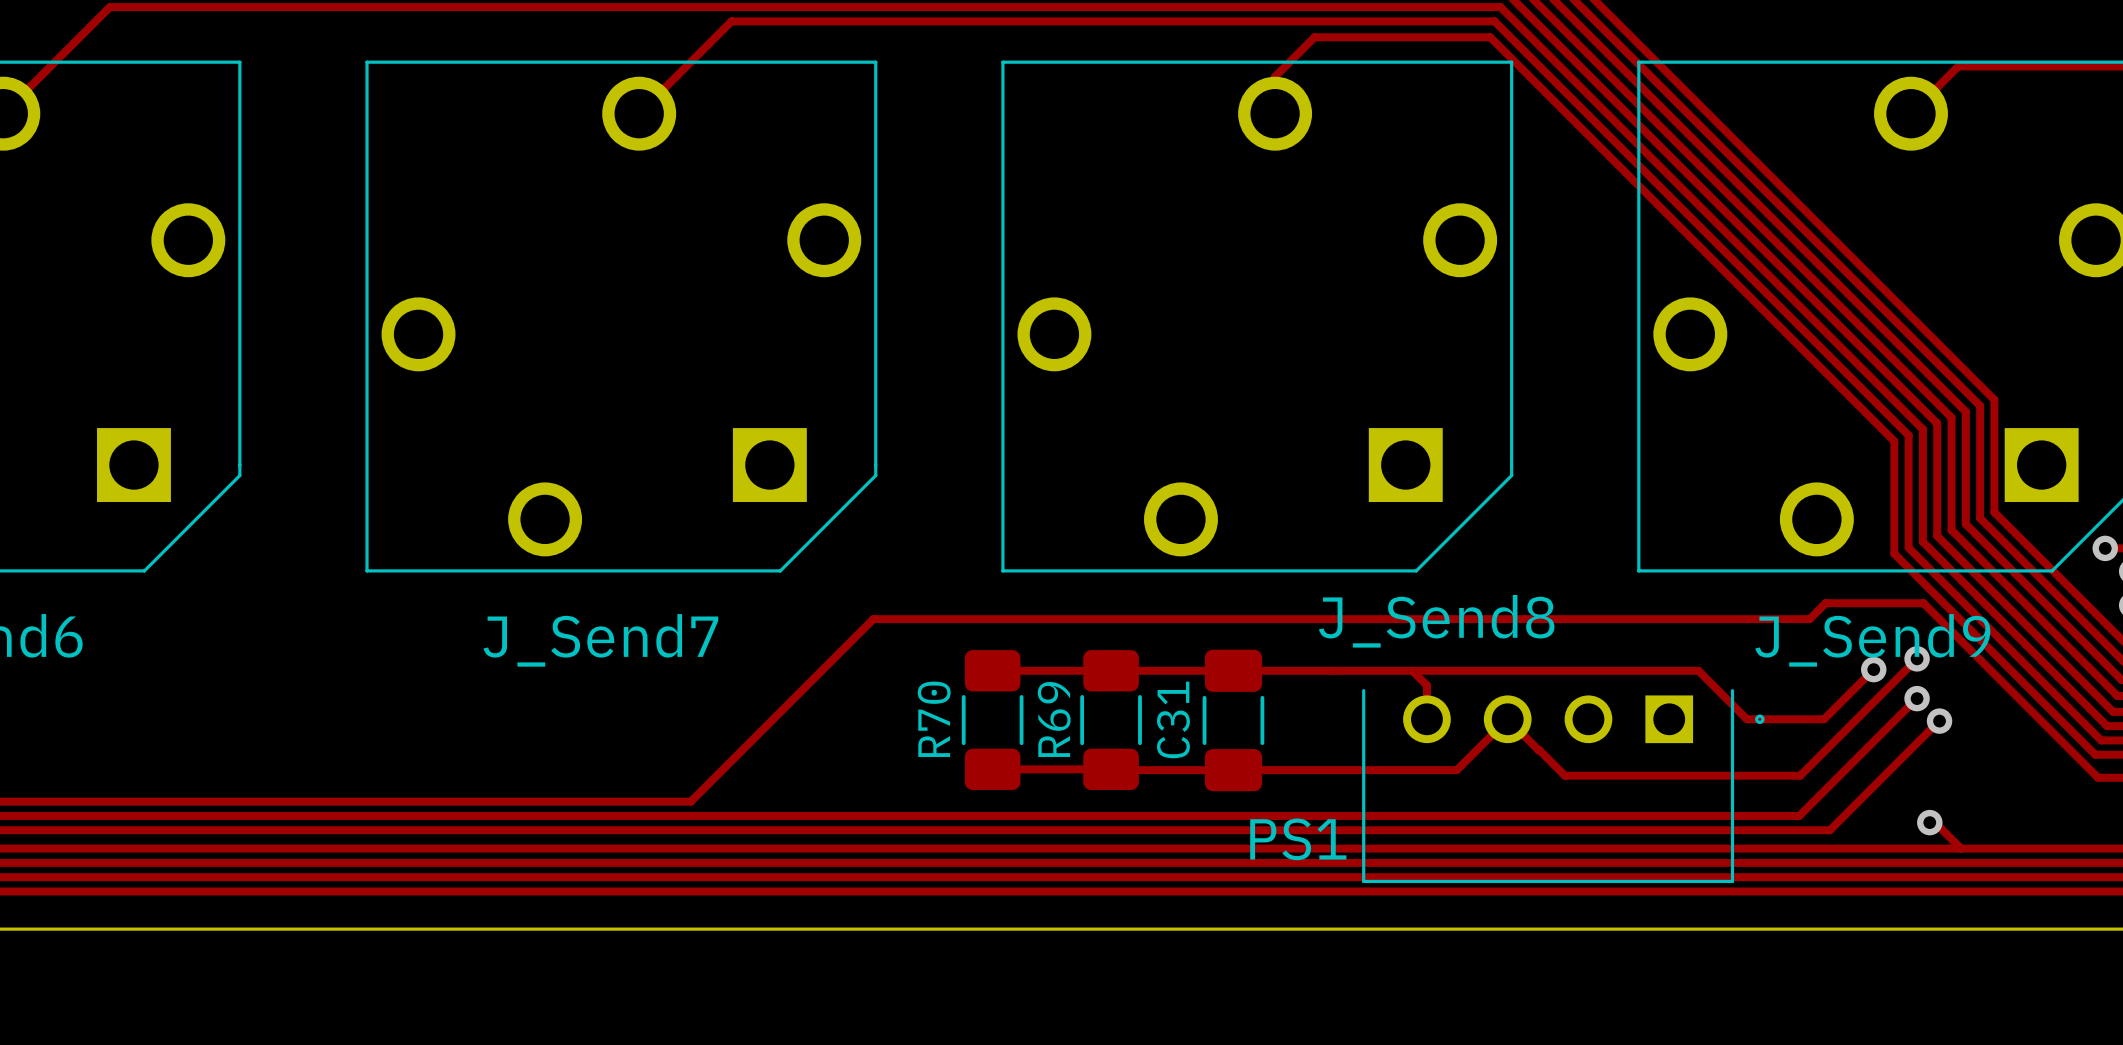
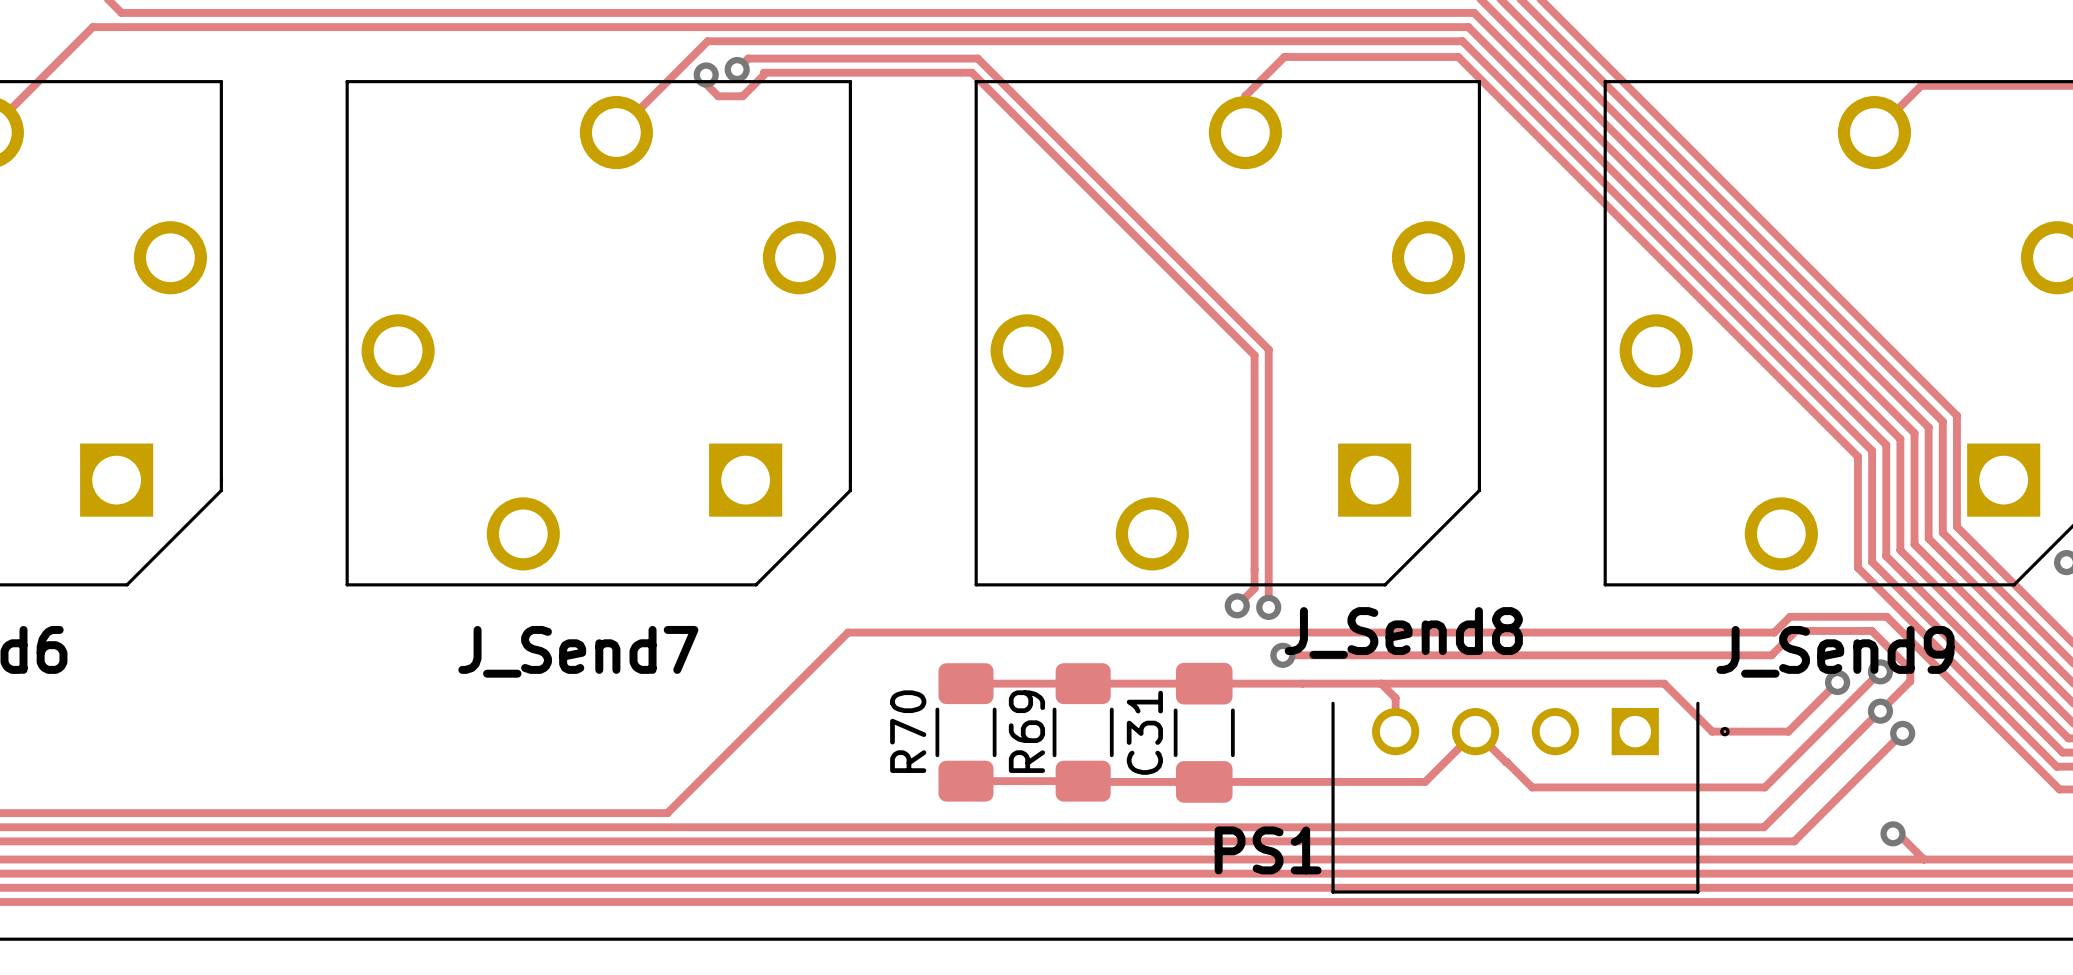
track: none -> (737, 69) (748, 58) (977, 58) (1268, 349) (1268, 607)
via: none -> (737, 69)
track: none -> (706, 74) (706, 84) (718, 96) (742, 96) (763, 75) (763, 72) (971, 72) (1254, 355) (1254, 588) (1237, 605)
via: none -> (706, 74)
via: none -> (1237, 605)
via: none -> (1268, 607)
track: none -> (1282, 655) (1771, 655) (1795, 630) (1871, 630) (1910, 669) (1910, 681) (1880, 711)
via: none -> (1282, 655)

